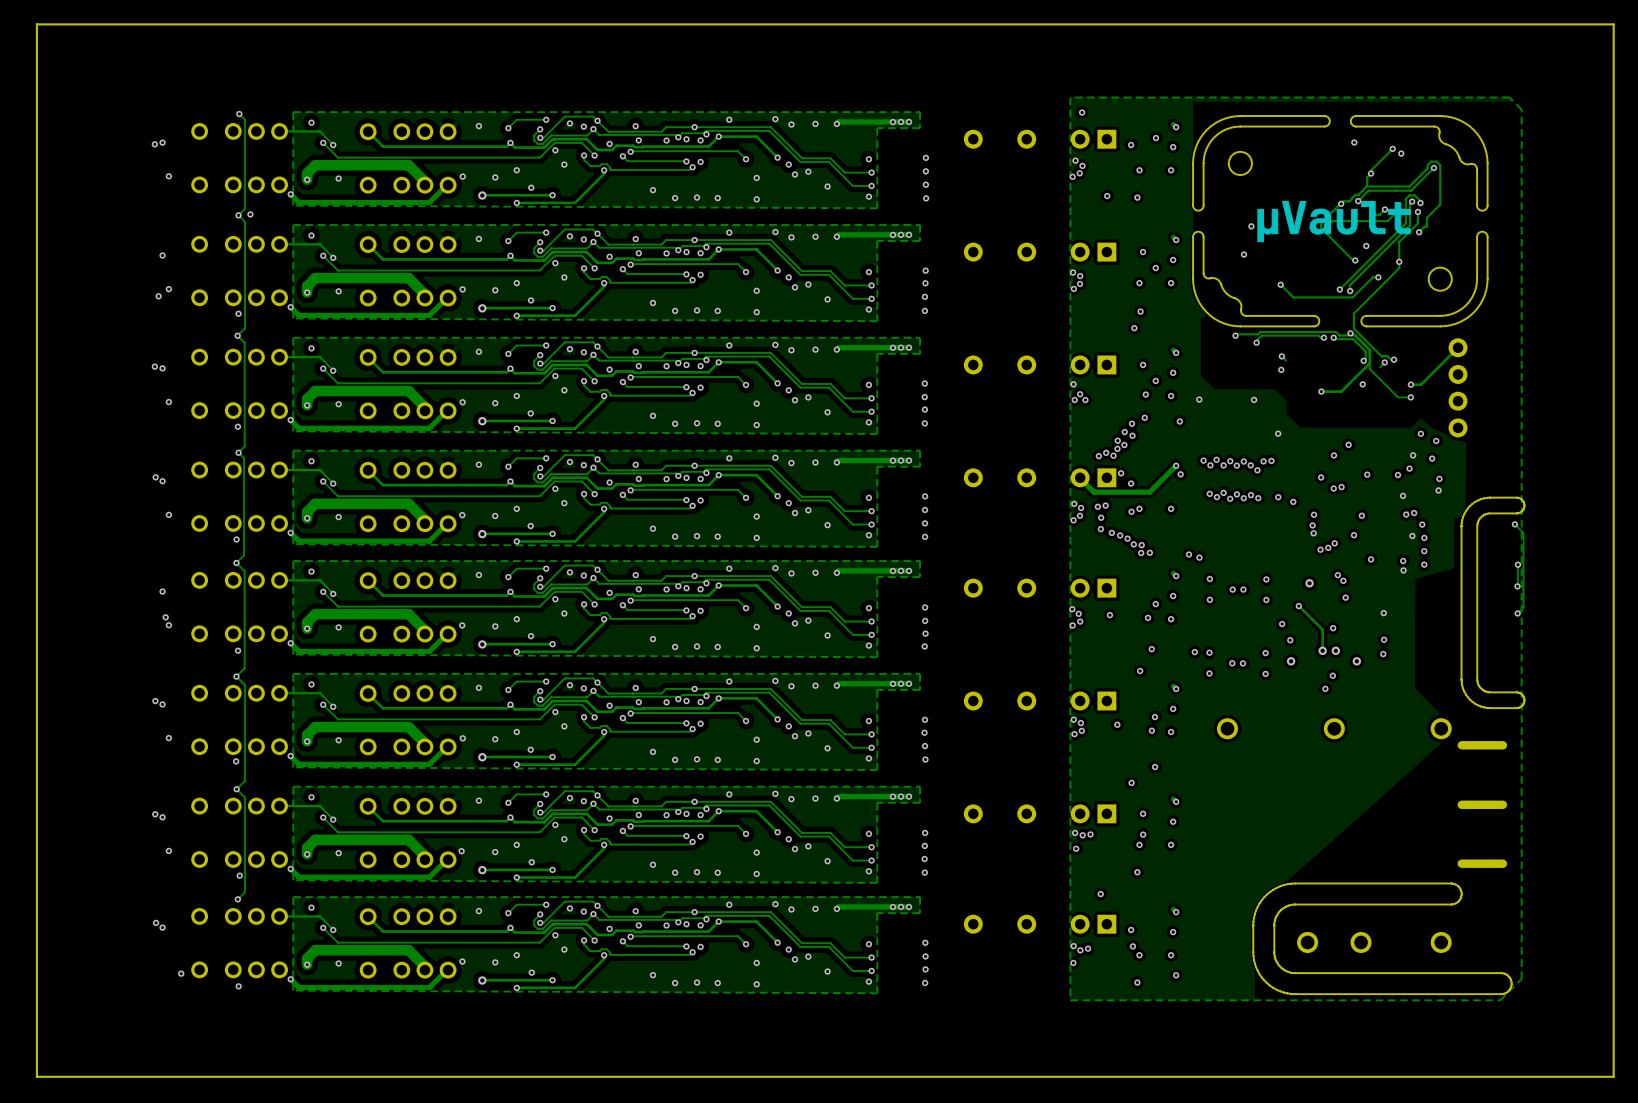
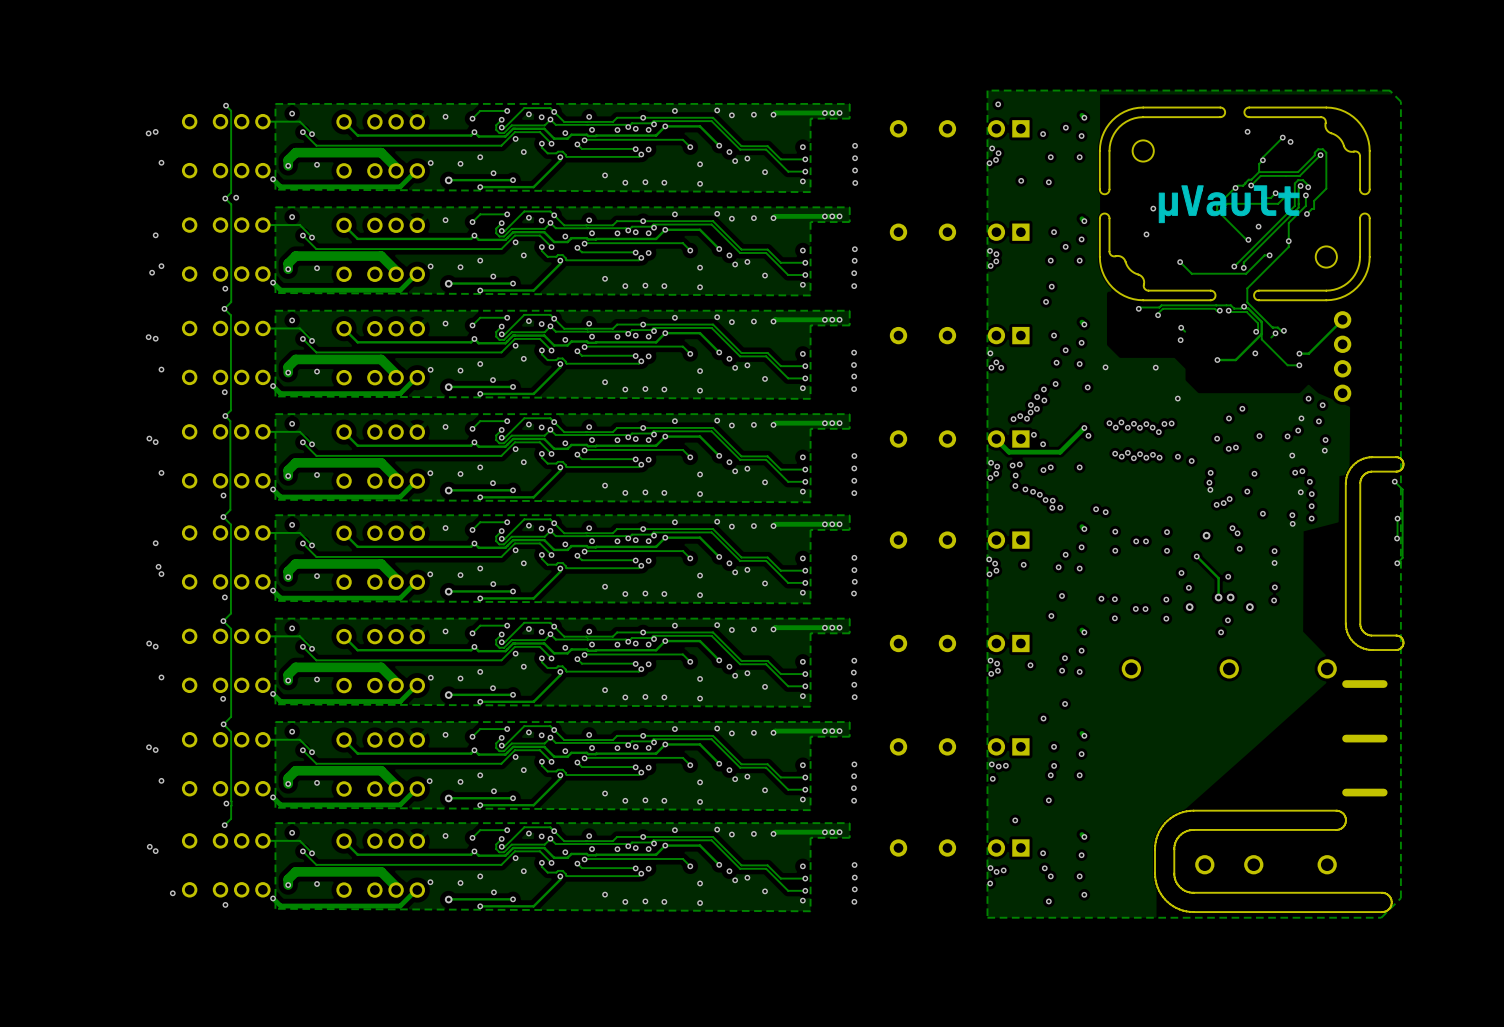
board edge: (1613, 24) (36, 24) (36, 1076) (1613, 1076) (1613, 24) -> none
via: none -> (1274, 551)

